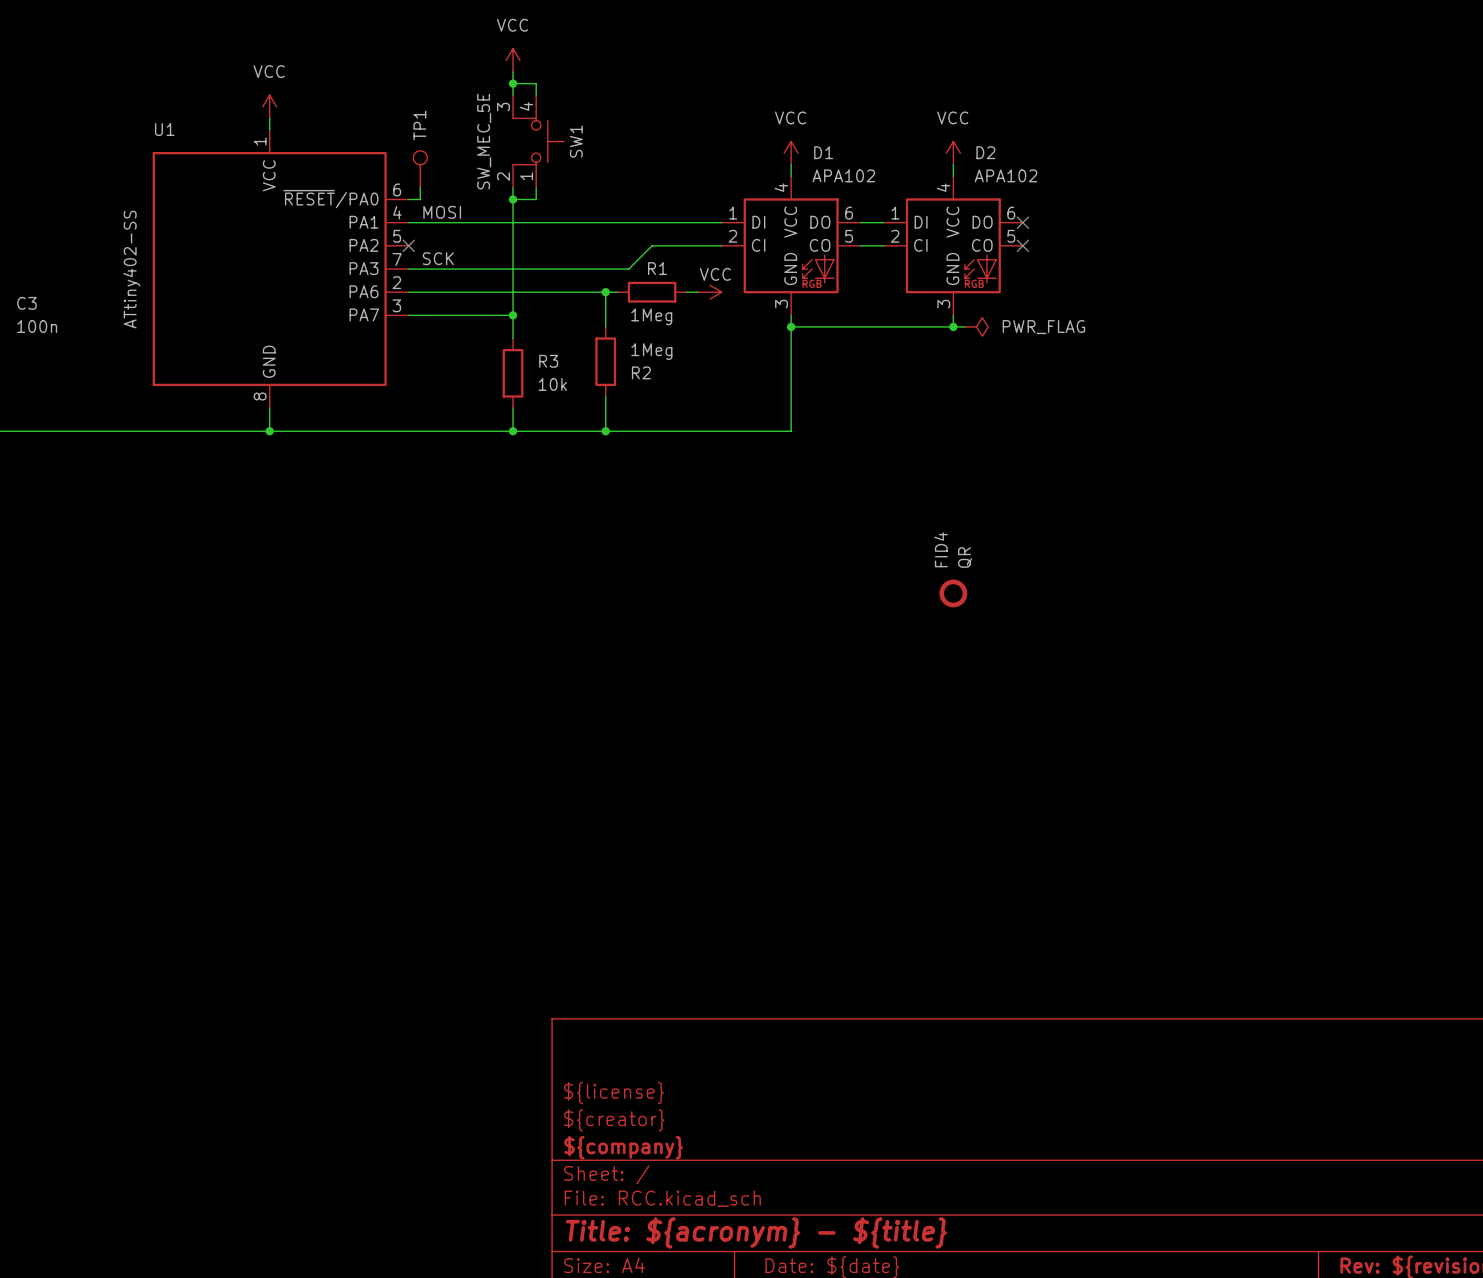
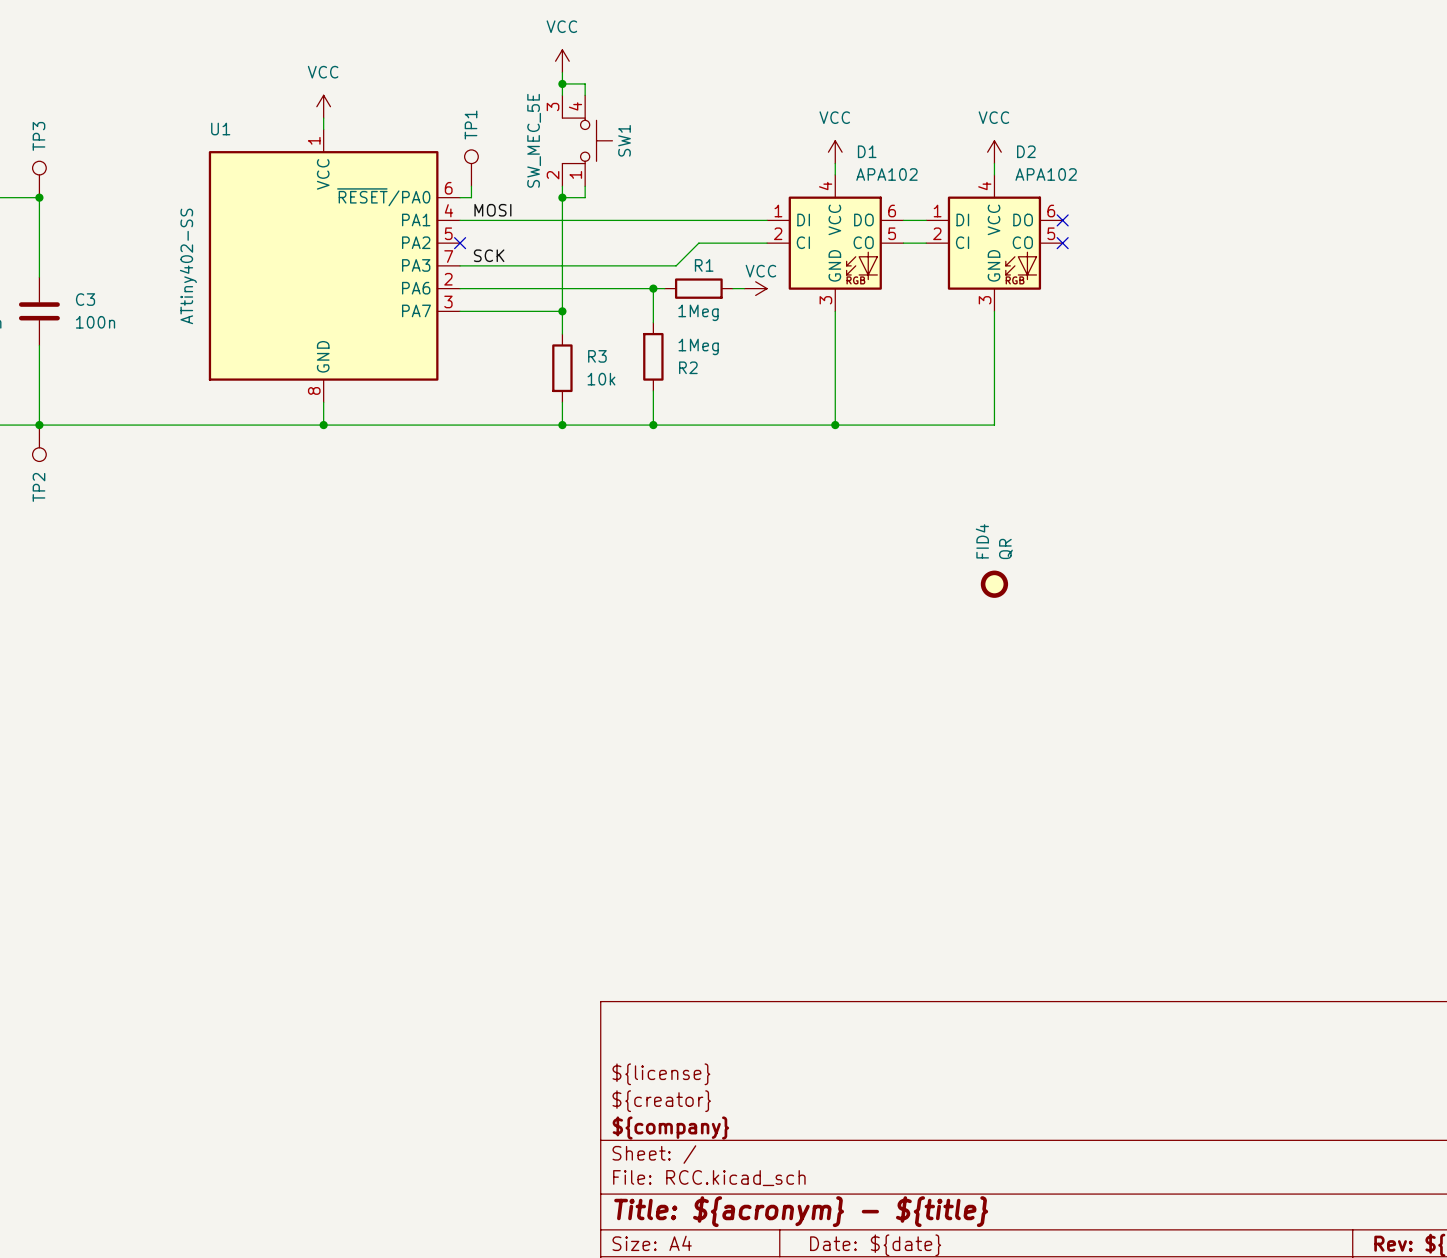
wire: (791, 326) (964, 326) -> none
junction: (791, 326) -> none
wire: none -> (994, 322) (994, 425) (835, 425)
junction: (953, 326) -> none
power symbol: PWR_FLAG (976, 326) -> none
junction: none -> (835, 425)

